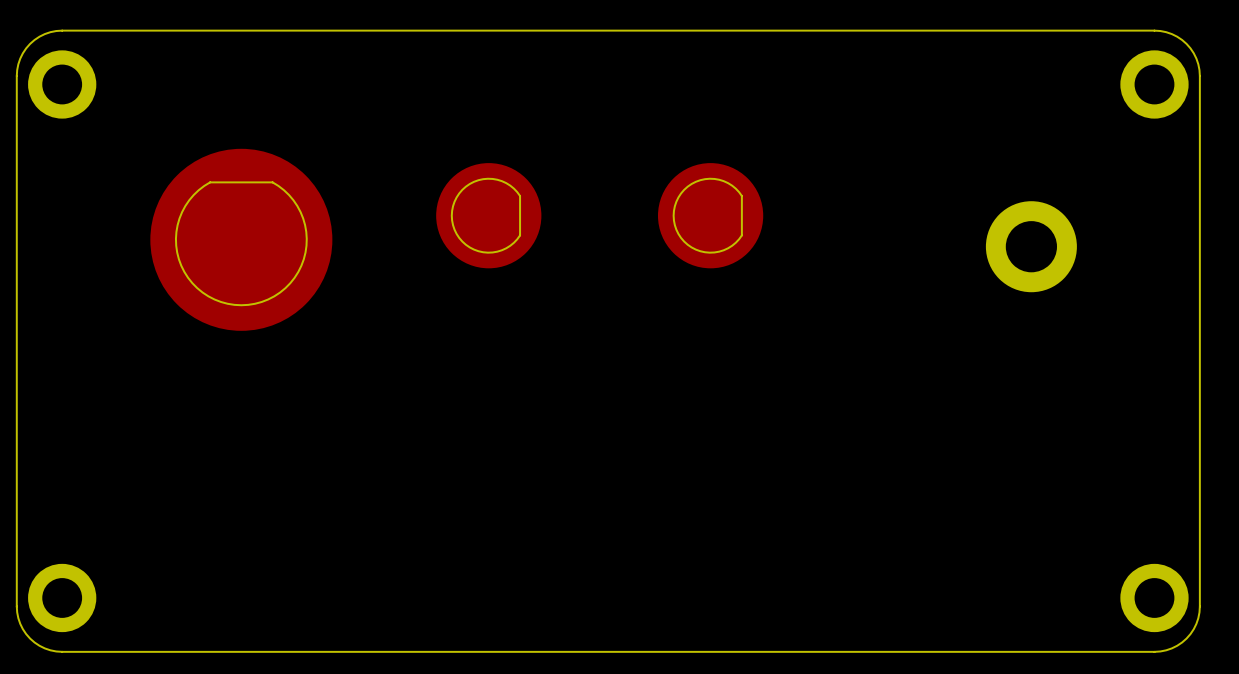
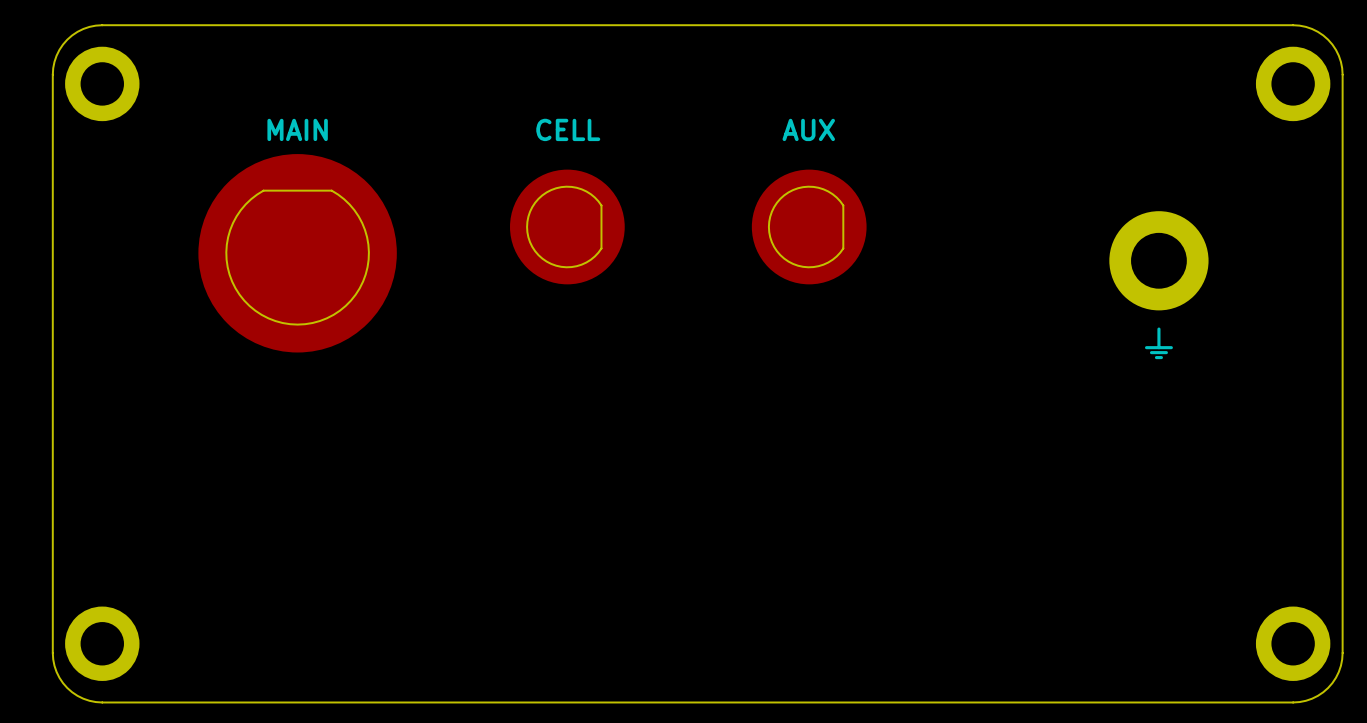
text: none -> MAIN (297, 129)
text: none -> CELL (568, 129)
text: none -> AUX (808, 129)
line: none -> (1158, 329) (1158, 347)
line: none -> (1146, 347) (1171, 347)
line: none -> (1151, 352) (1166, 352)
line: none -> (1156, 357) (1161, 357)

